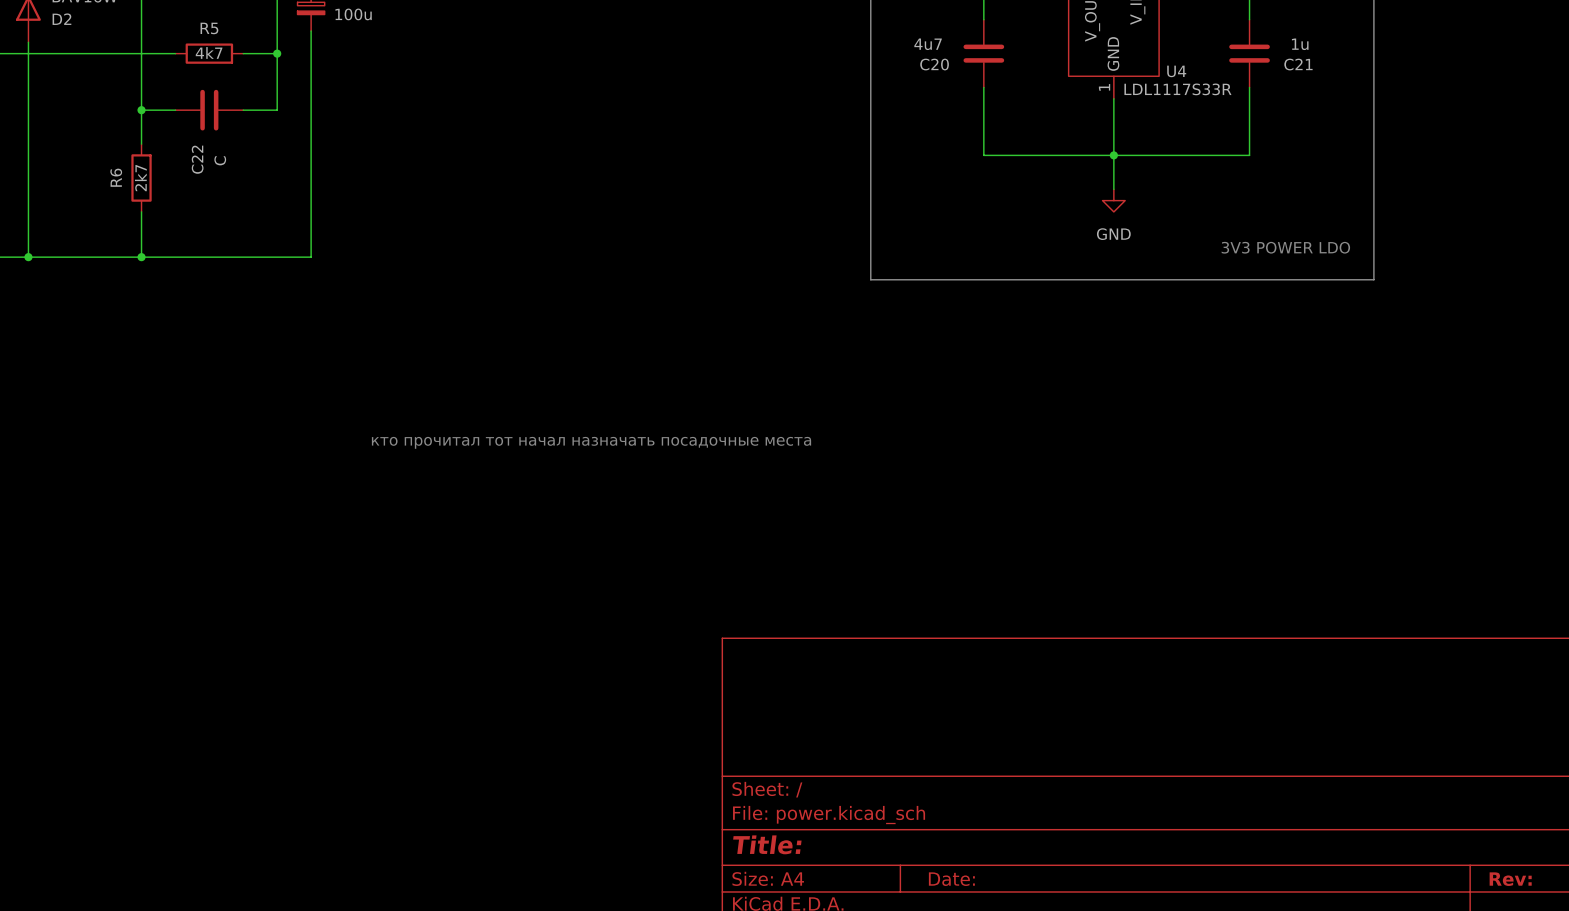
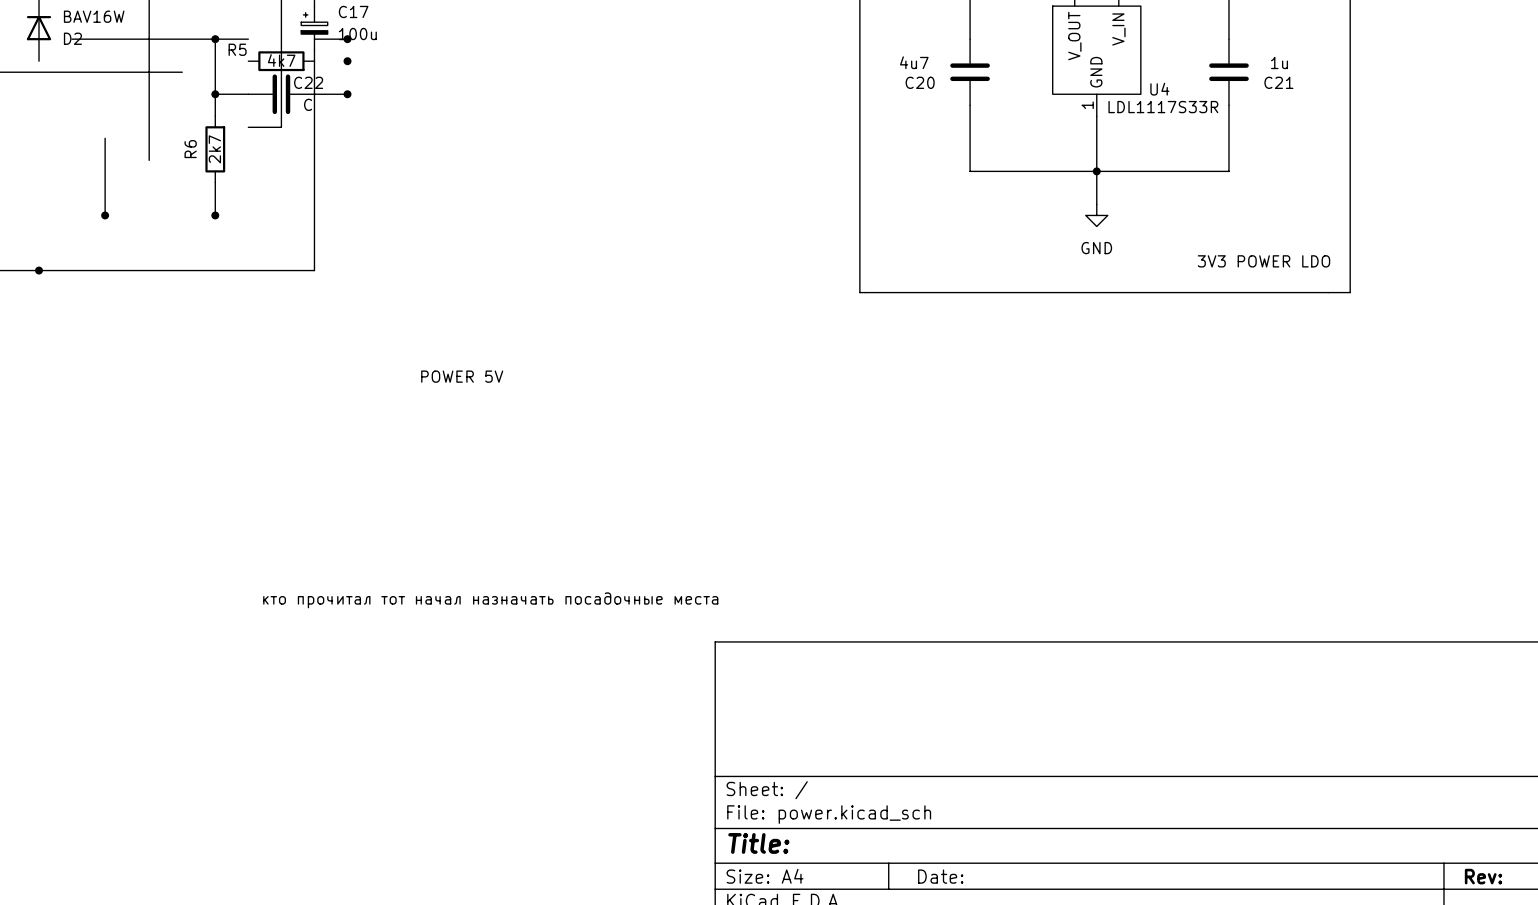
wire: none -> (72, 39) (248, 39)
wire: none -> (215, 39) (215, 116)
junction: none -> (215, 39)
junction: none -> (347, 39)
R5 name position: R5 (209, 28) -> R5 (237, 49)
wire: (28, 42) (28, 257) -> none
junction: none -> (347, 61)
R5 position: (209, 53) -> (281, 61)
wire: (243, 53) (277, 53) -> (314, 39) (347, 39)
junction: (277, 53) -> none
junction: none -> (215, 94)
wire: none -> (314, 94) (347, 94)
junction: none -> (347, 94)
wire: (141, 110) (175, 110) -> (215, 94) (248, 94)
junction: (141, 110) -> none
C22 position: (209, 110) -> (281, 94)
wire: none -> (105, 138) (105, 215)
C22 name rotation: 0° (197, 159) -> 90° clockwise (308, 82)
C22 name position: C22 (197, 159) -> C22 (308, 82)
C22 value rotation: 0° (220, 160) -> 90° clockwise (308, 104)
C22 value position: C (220, 160) -> C (308, 104)
wire: none -> (215, 182) (215, 215)
R6 position: (141, 178) -> (215, 149)
junction: none -> (105, 215)
junction: none -> (215, 215)
wire: (141, 211) (141, 257) -> none
junction: (141, 257) -> none
text: none -> POWER 5V (462, 376)
text position: кто прочитал тот начал назначать посадочные места (591, 442) -> кто прочитал тот начал назначать посадочные места (490, 600)

